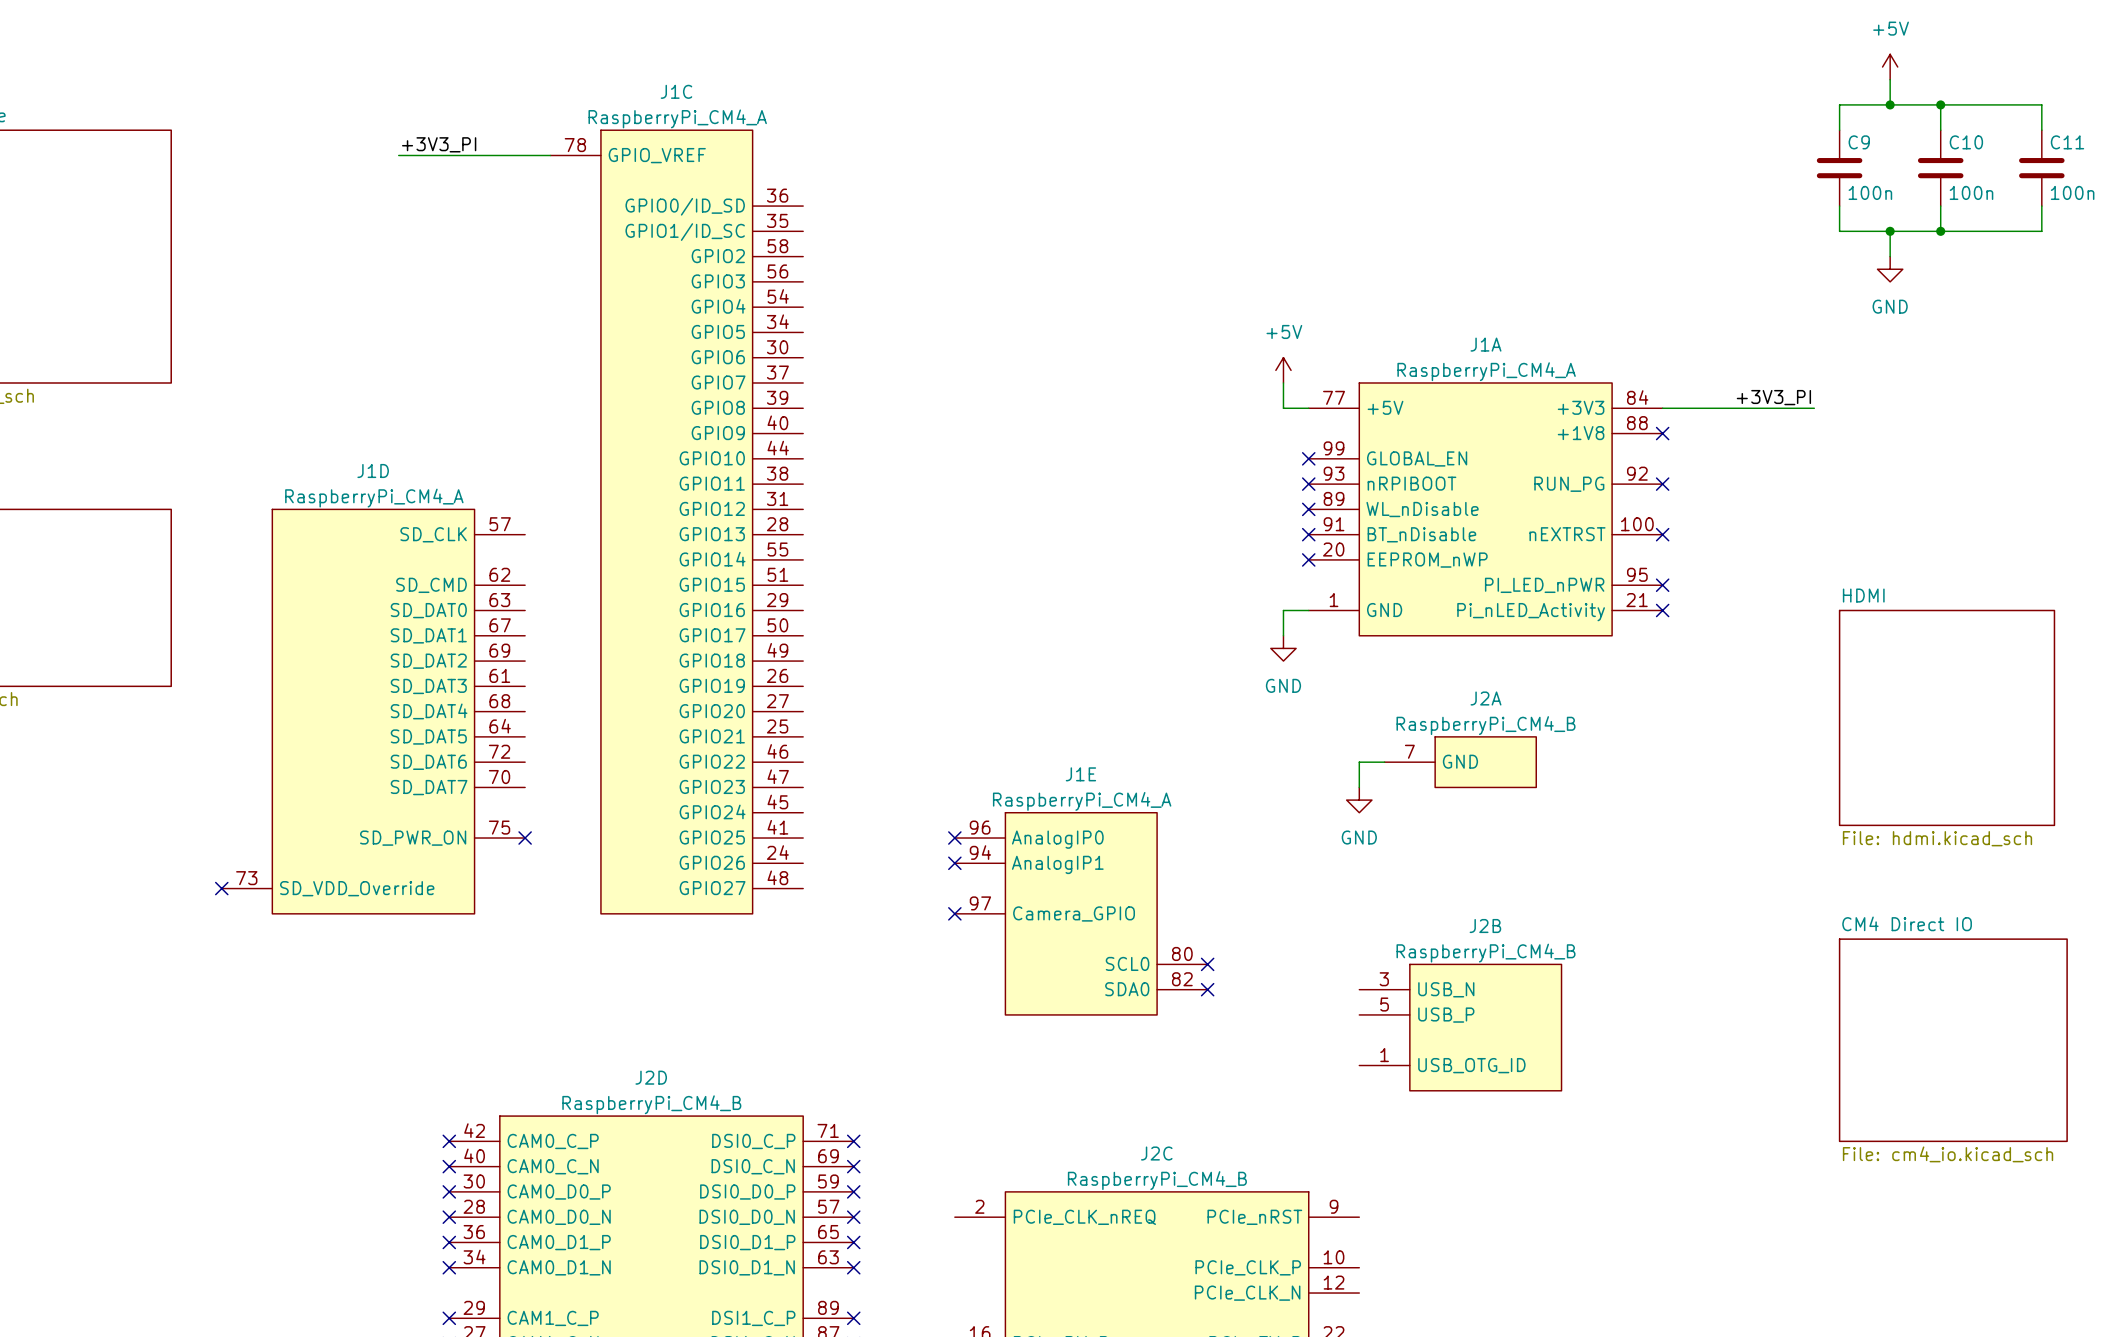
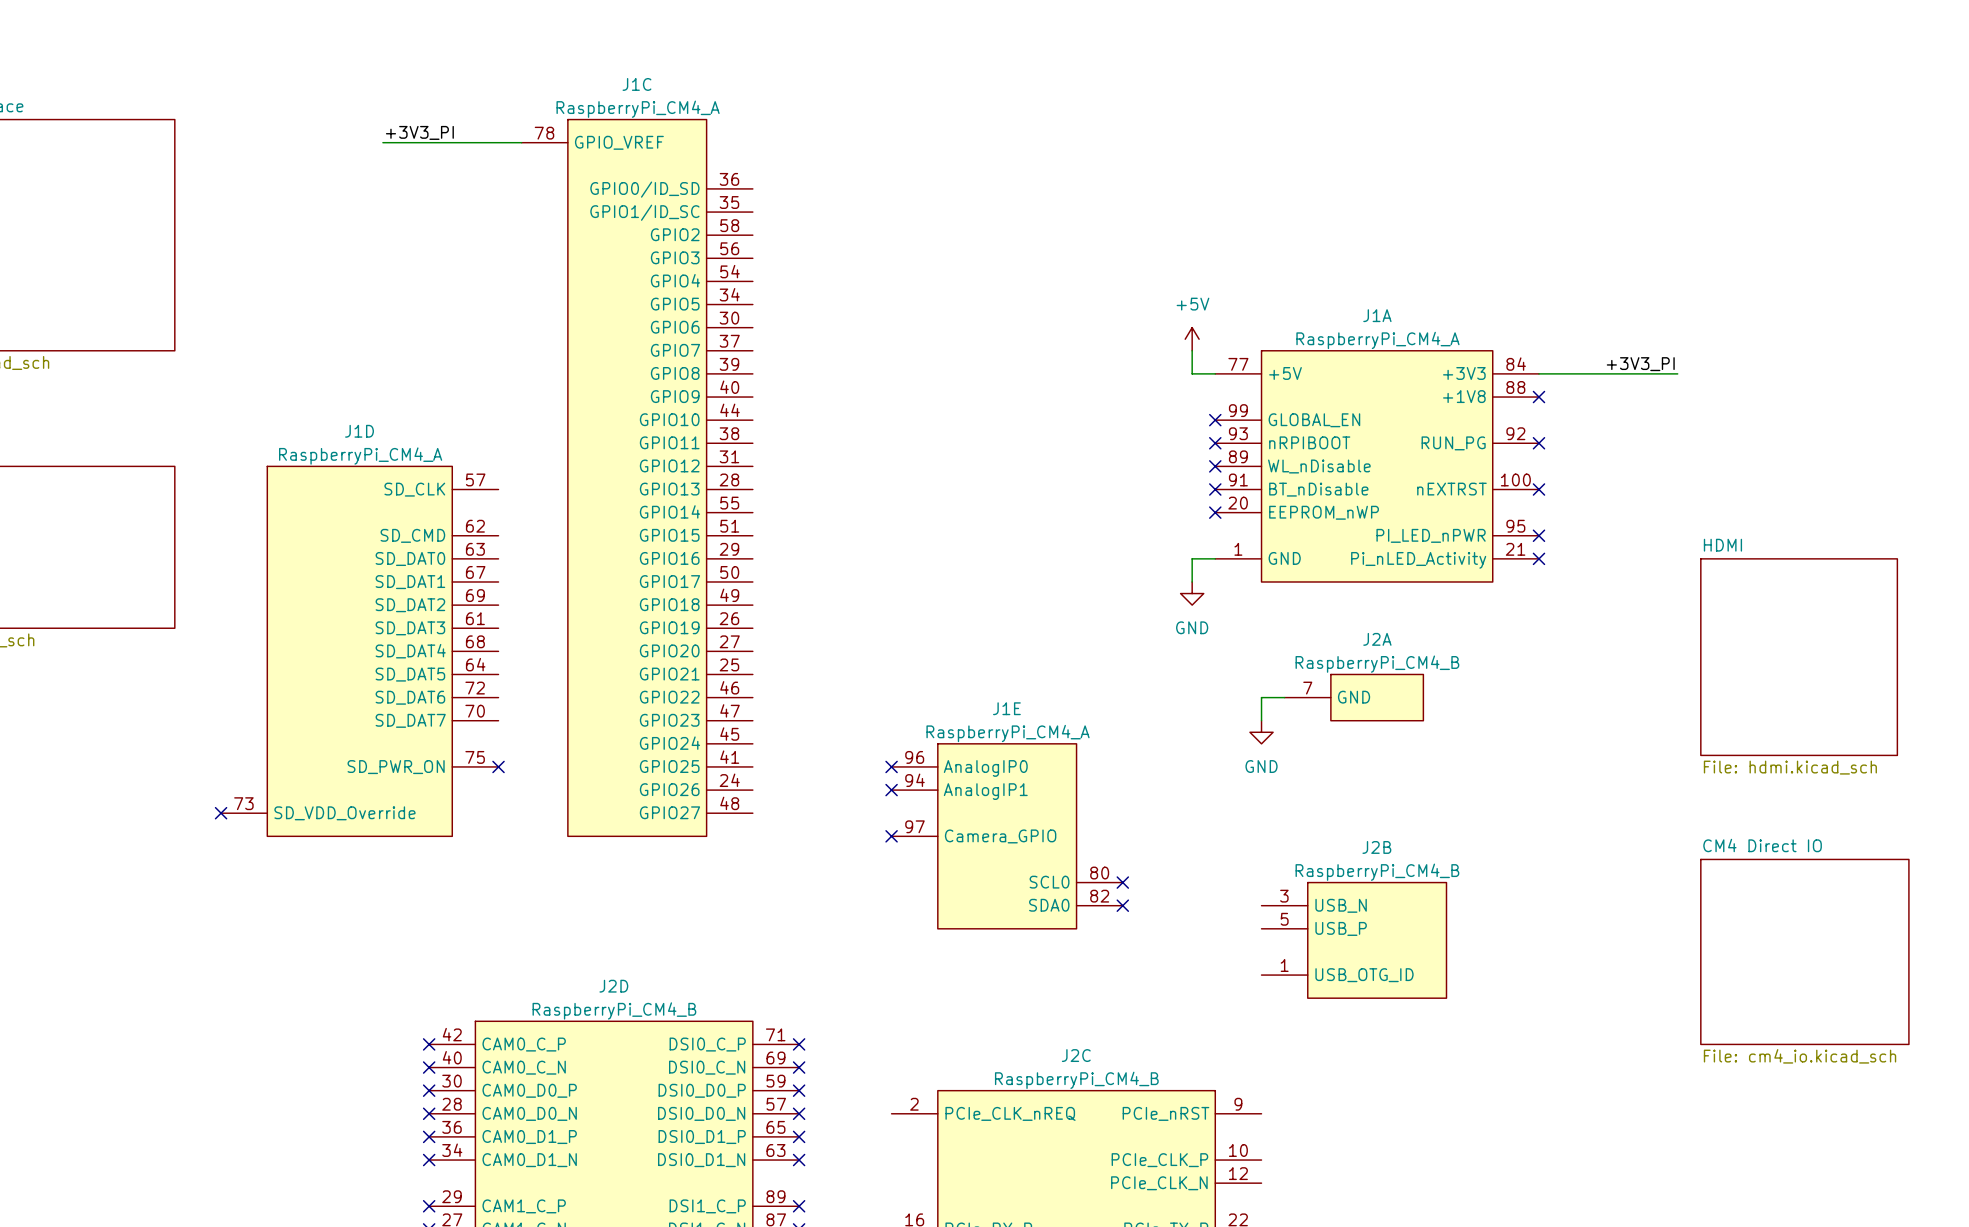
power symbol: +5V (1890, 67) -> none
wire: (1890, 79) (1890, 104) -> none
junction: (1890, 104) -> none
wire: (1940, 104) (1940, 130) -> none
junction: (1940, 104) -> none
wire: (1839, 130) (1839, 104) (2041, 104) (2041, 130) -> none
C9: 100n (1839, 168) -> none
C10: 100n (1940, 168) -> none
C11: 100n (2041, 168) -> none
wire: (1839, 206) (1839, 231) (2041, 231) (2041, 206) -> none
wire: (1940, 206) (1940, 231) -> none
wire: (1890, 231) (1890, 256) -> none
junction: (1890, 231) -> none
junction: (1940, 231) -> none
power symbol: GND (1890, 269) -> none

